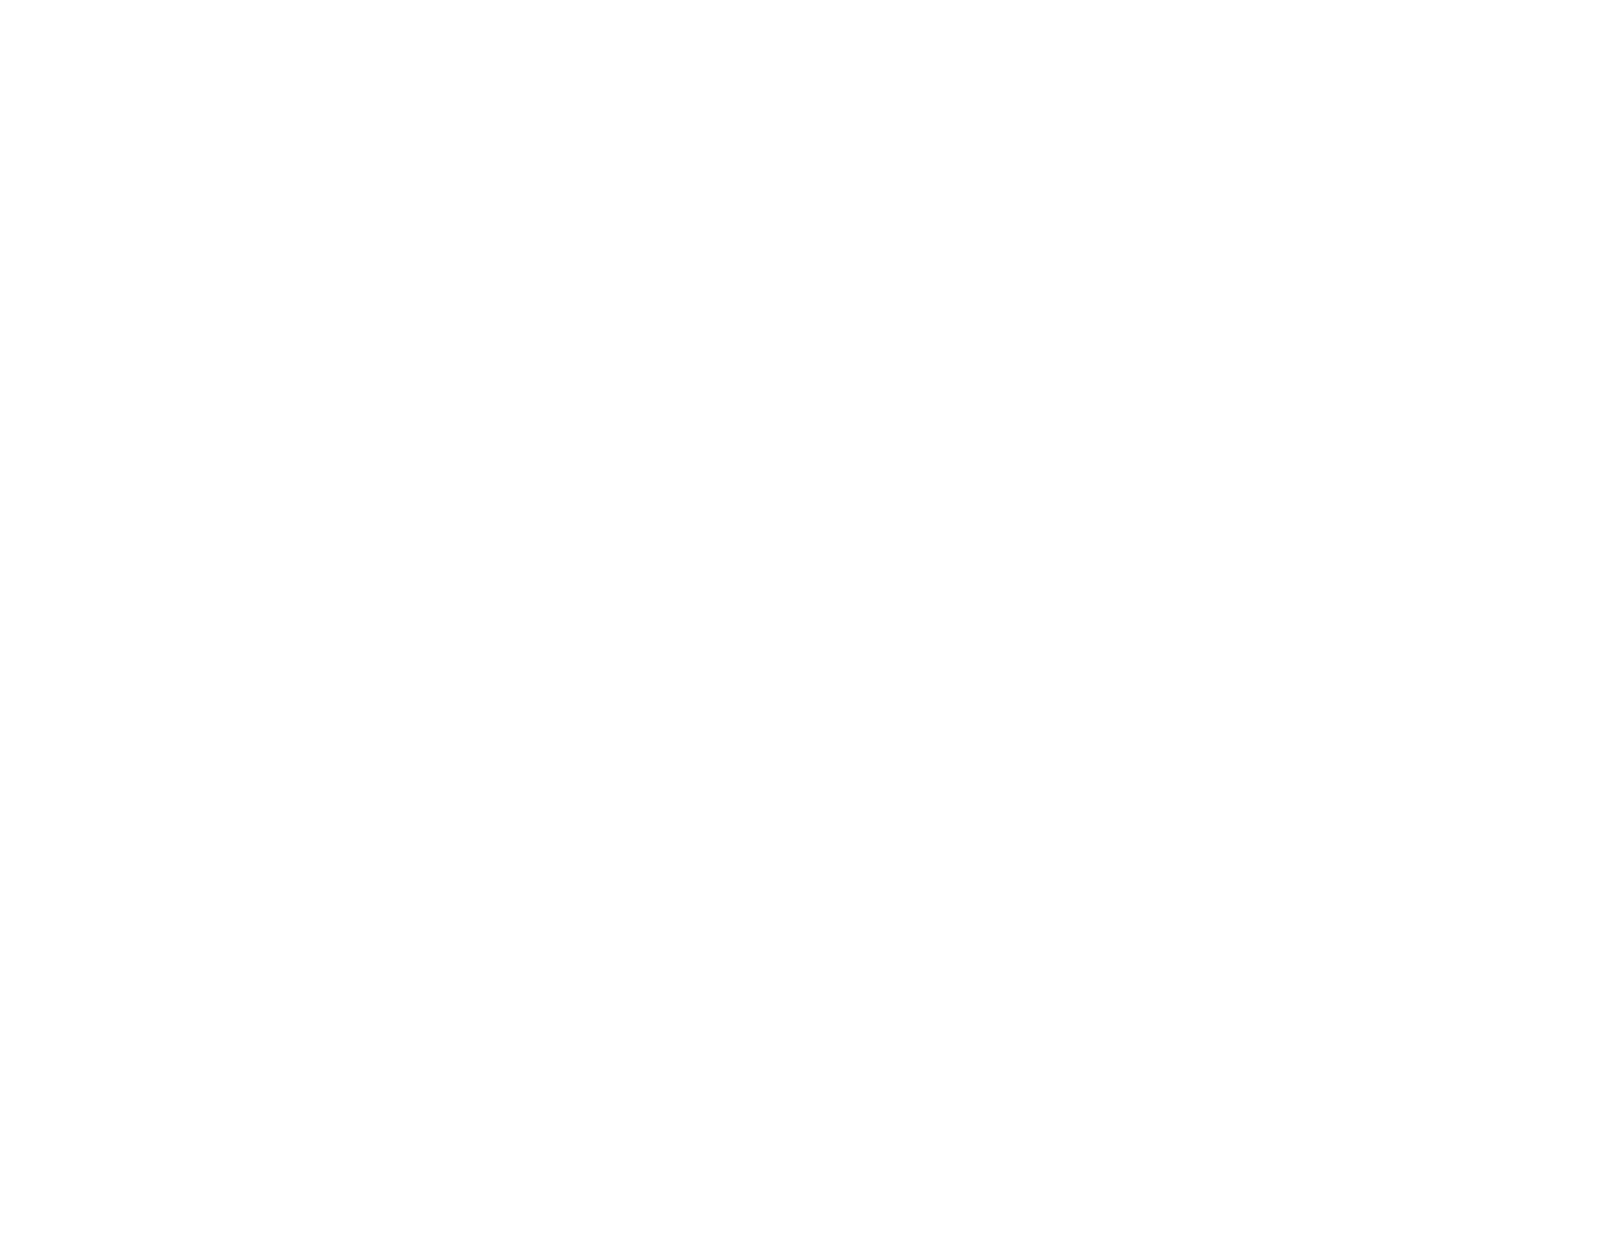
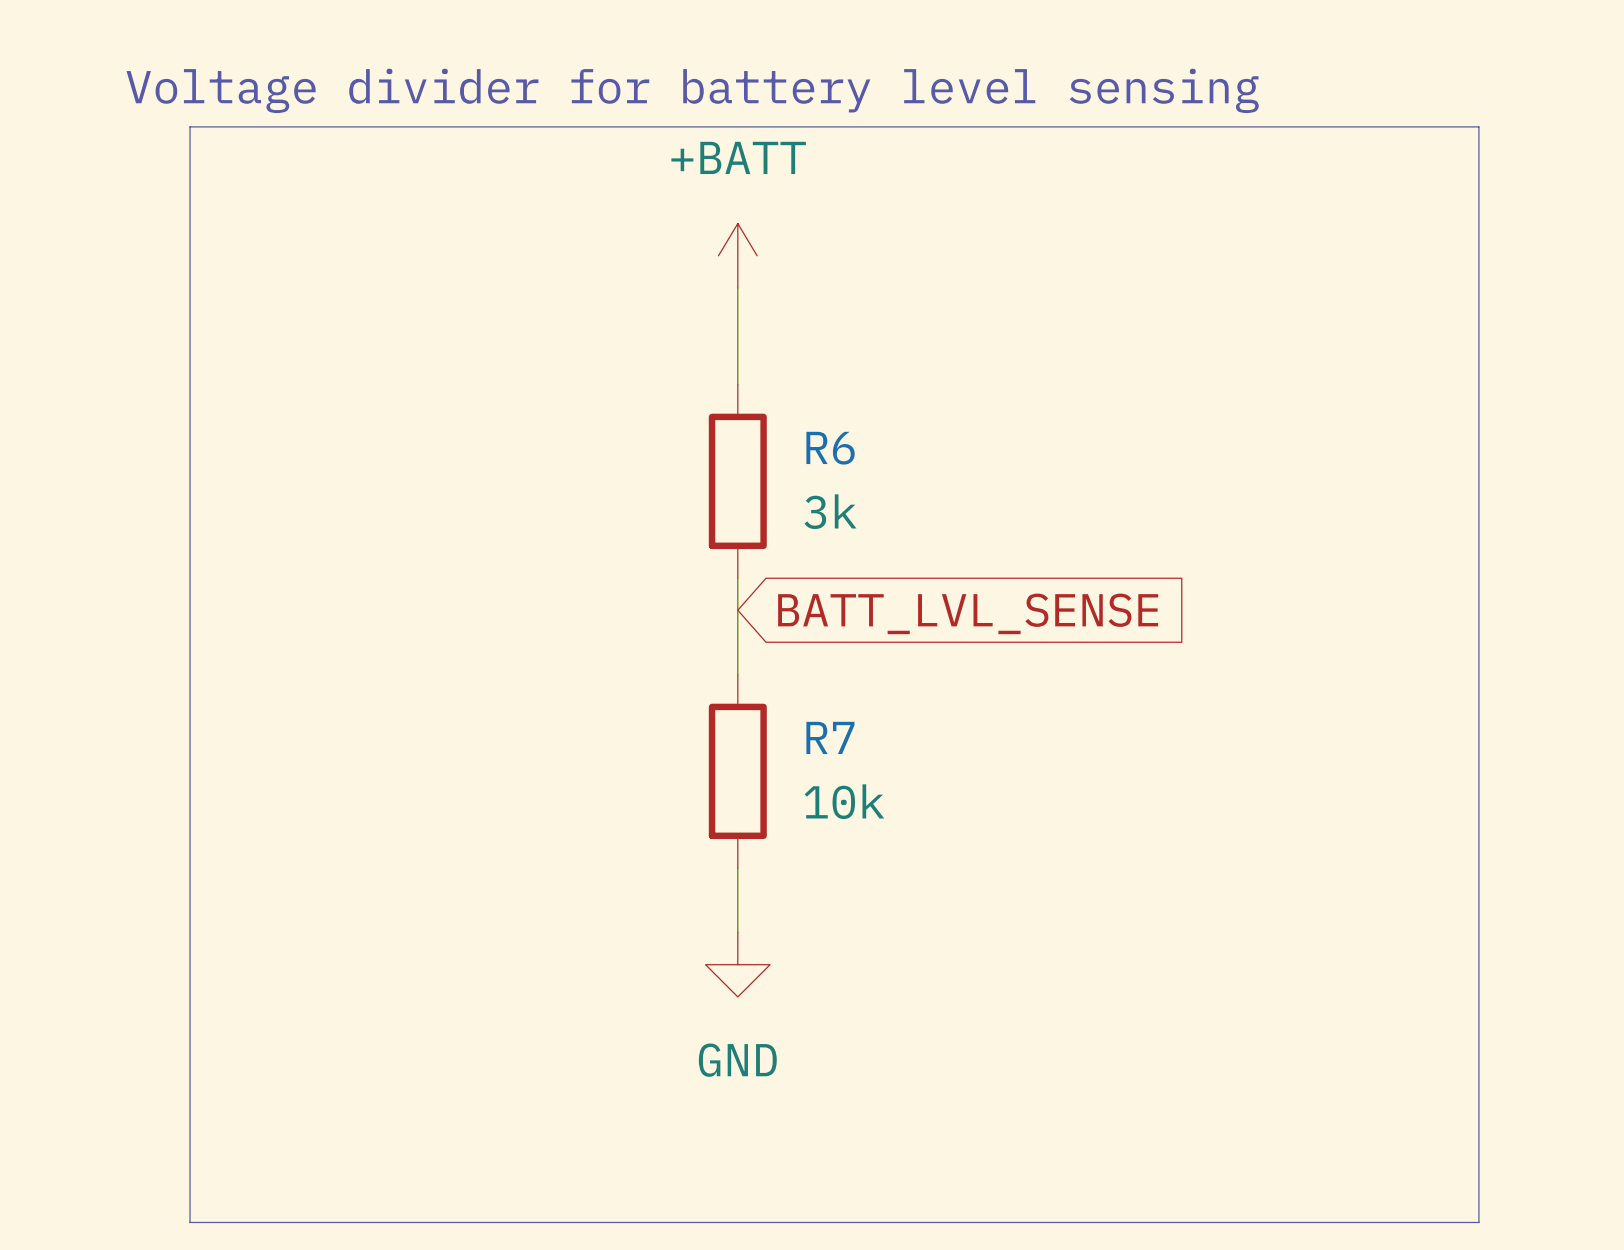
text: none -> Voltage divider for battery level sensing (692, 90)
line: none -> (190, 126) (1478, 126) (1478, 1222) (190, 1222) (190, 126)
power symbol: none -> +BATT (737, 255)
wire: none -> (737, 288) (737, 384)
R6: none -> 3k (737, 481)
wire: none -> (737, 578) (737, 674)
global label: none -> BATT_LVL_SENSE (968, 613)
R7: none -> 10k (737, 771)
wire: none -> (737, 868) (737, 932)
power symbol: none -> GND (737, 964)

